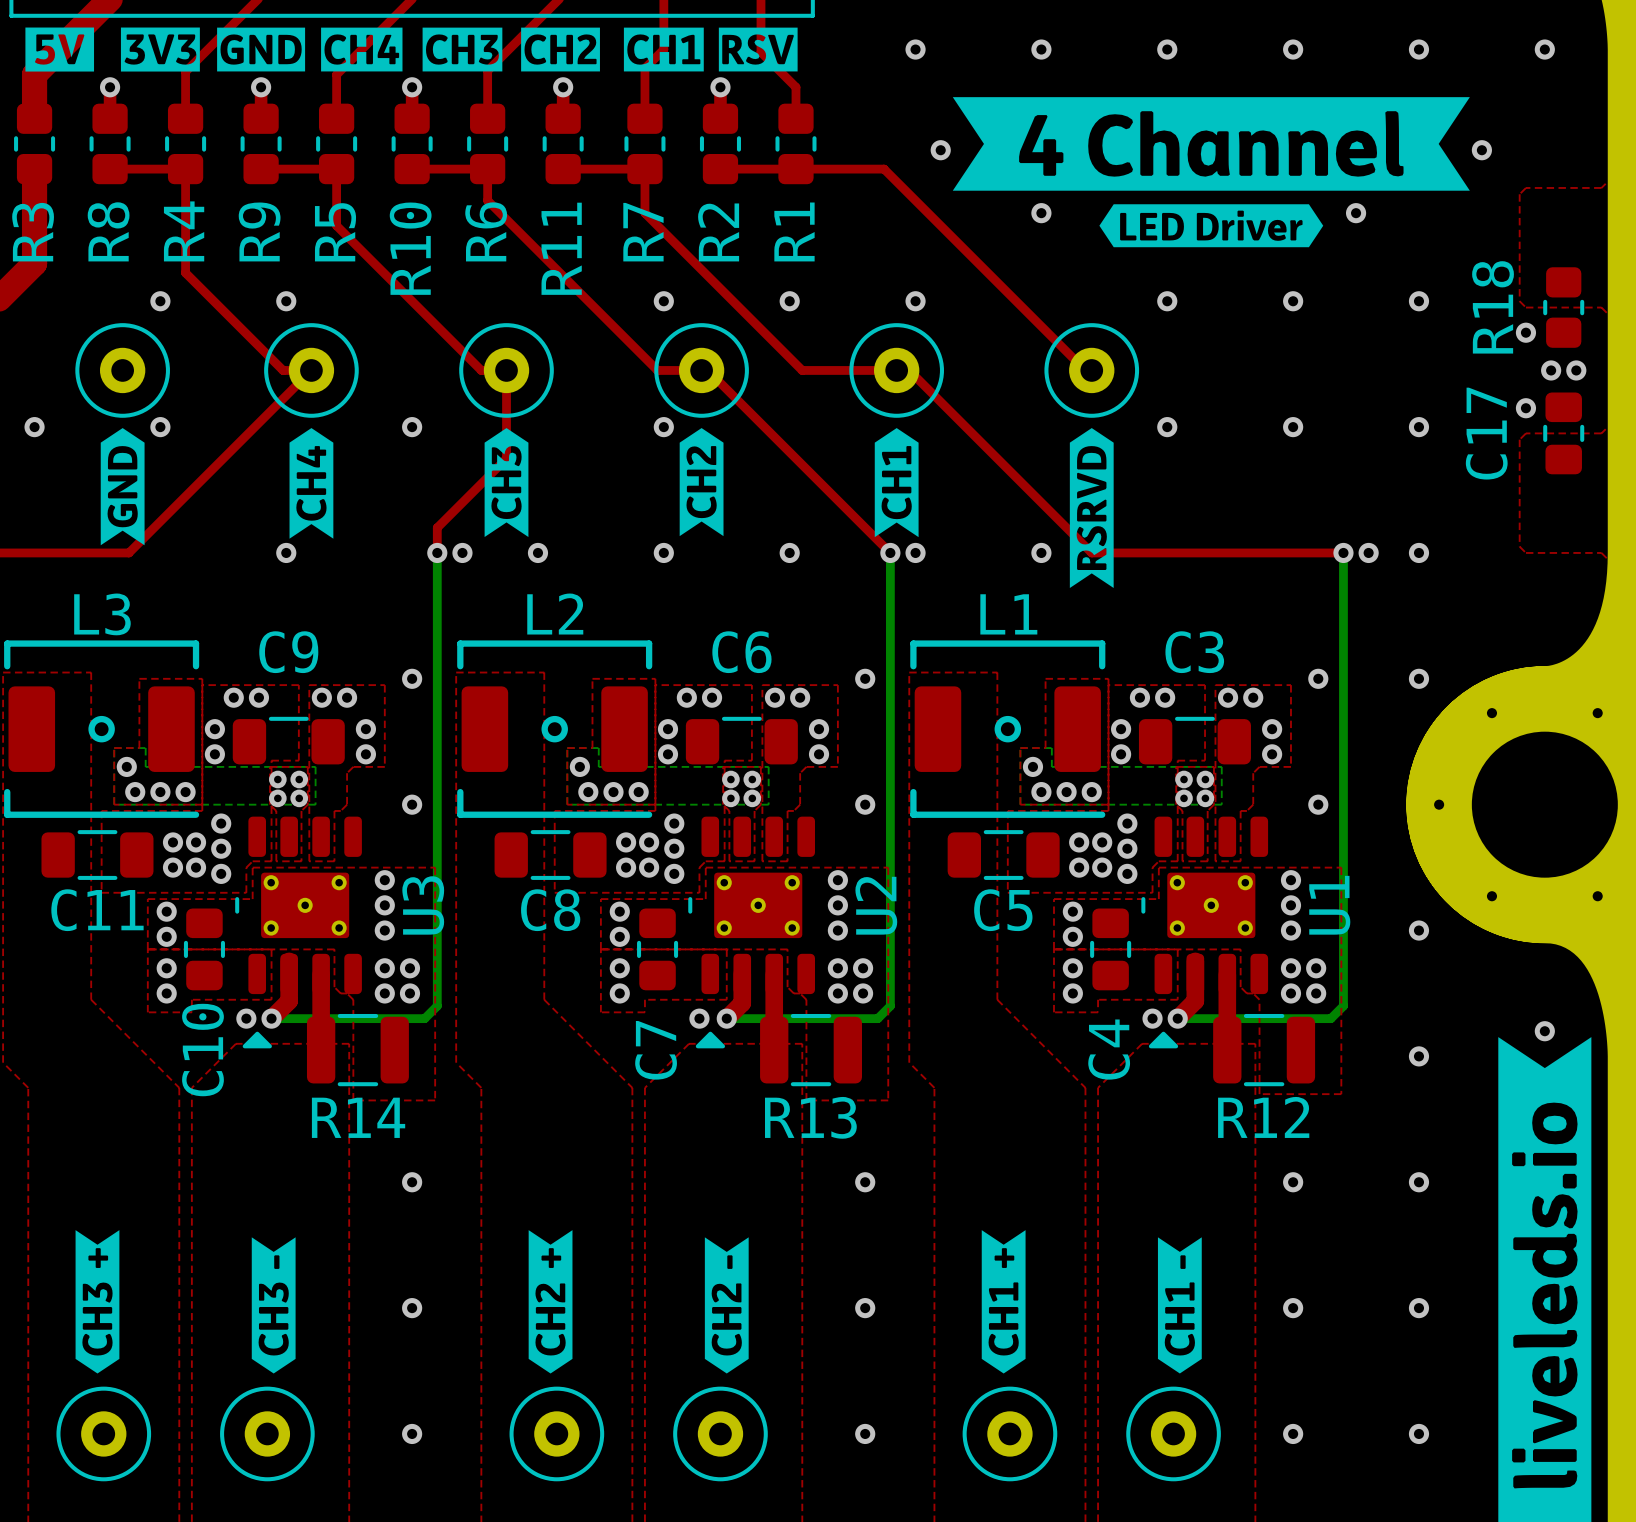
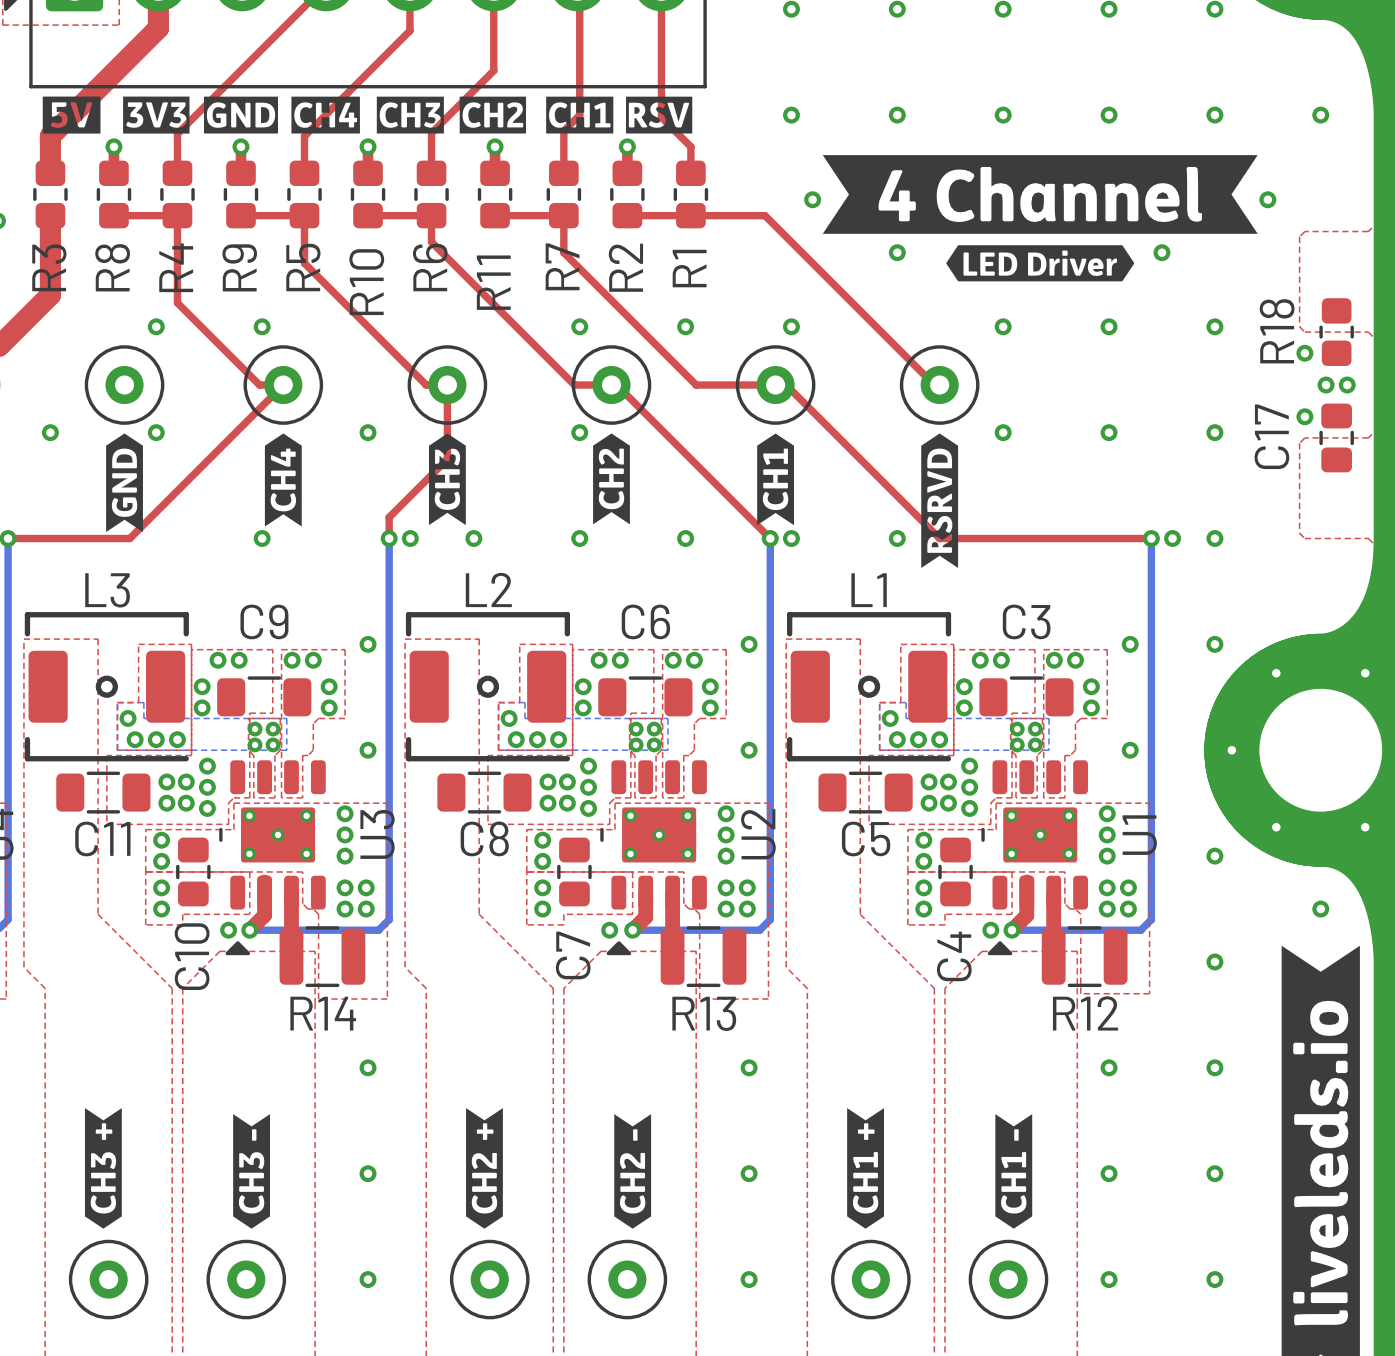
via position: (1544, 1031) -> (1320, 909)

